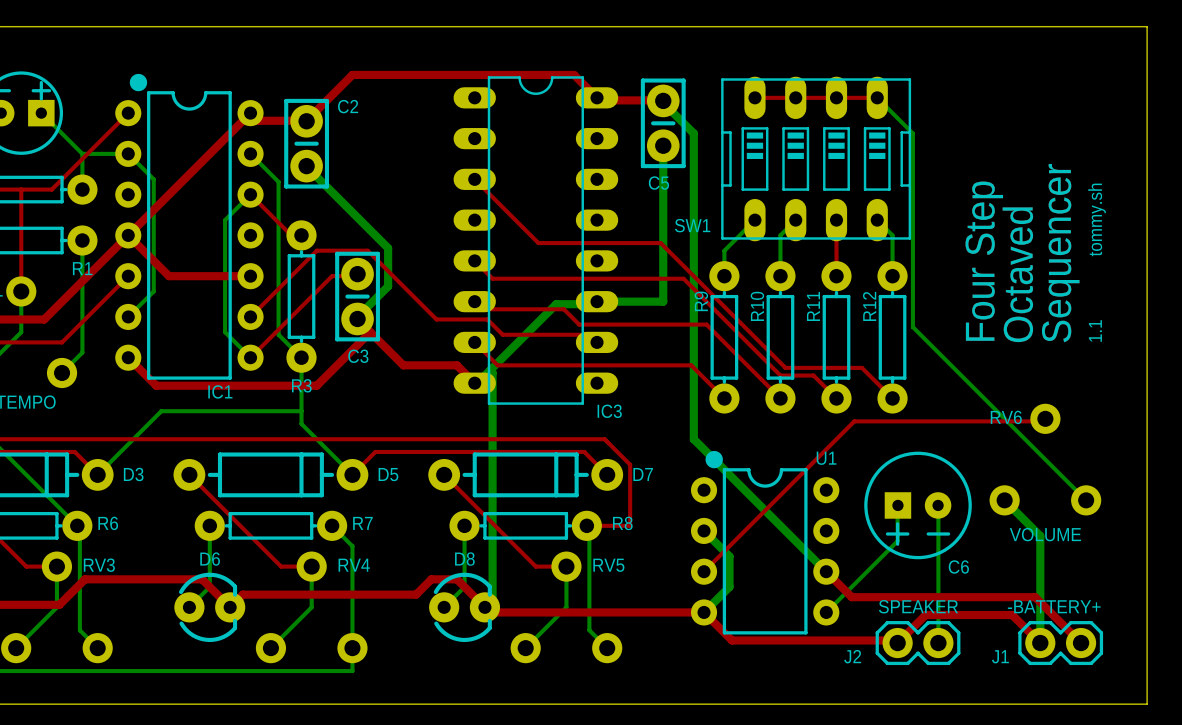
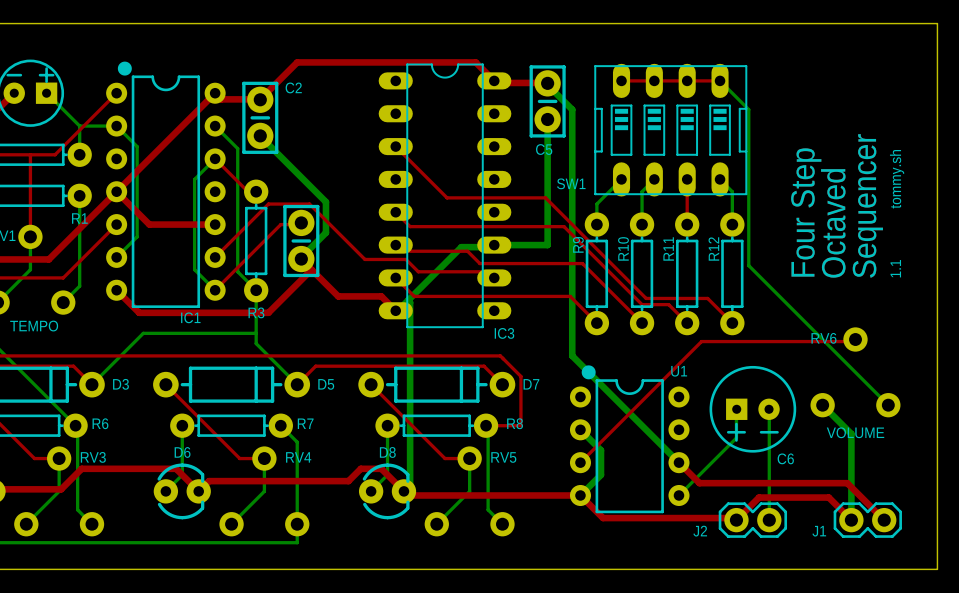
text: C3 (358, 356) -> none
J2 value: SPEAKER (918, 606) -> none
J1 value: -BATTERY+ (1054, 606) -> none

